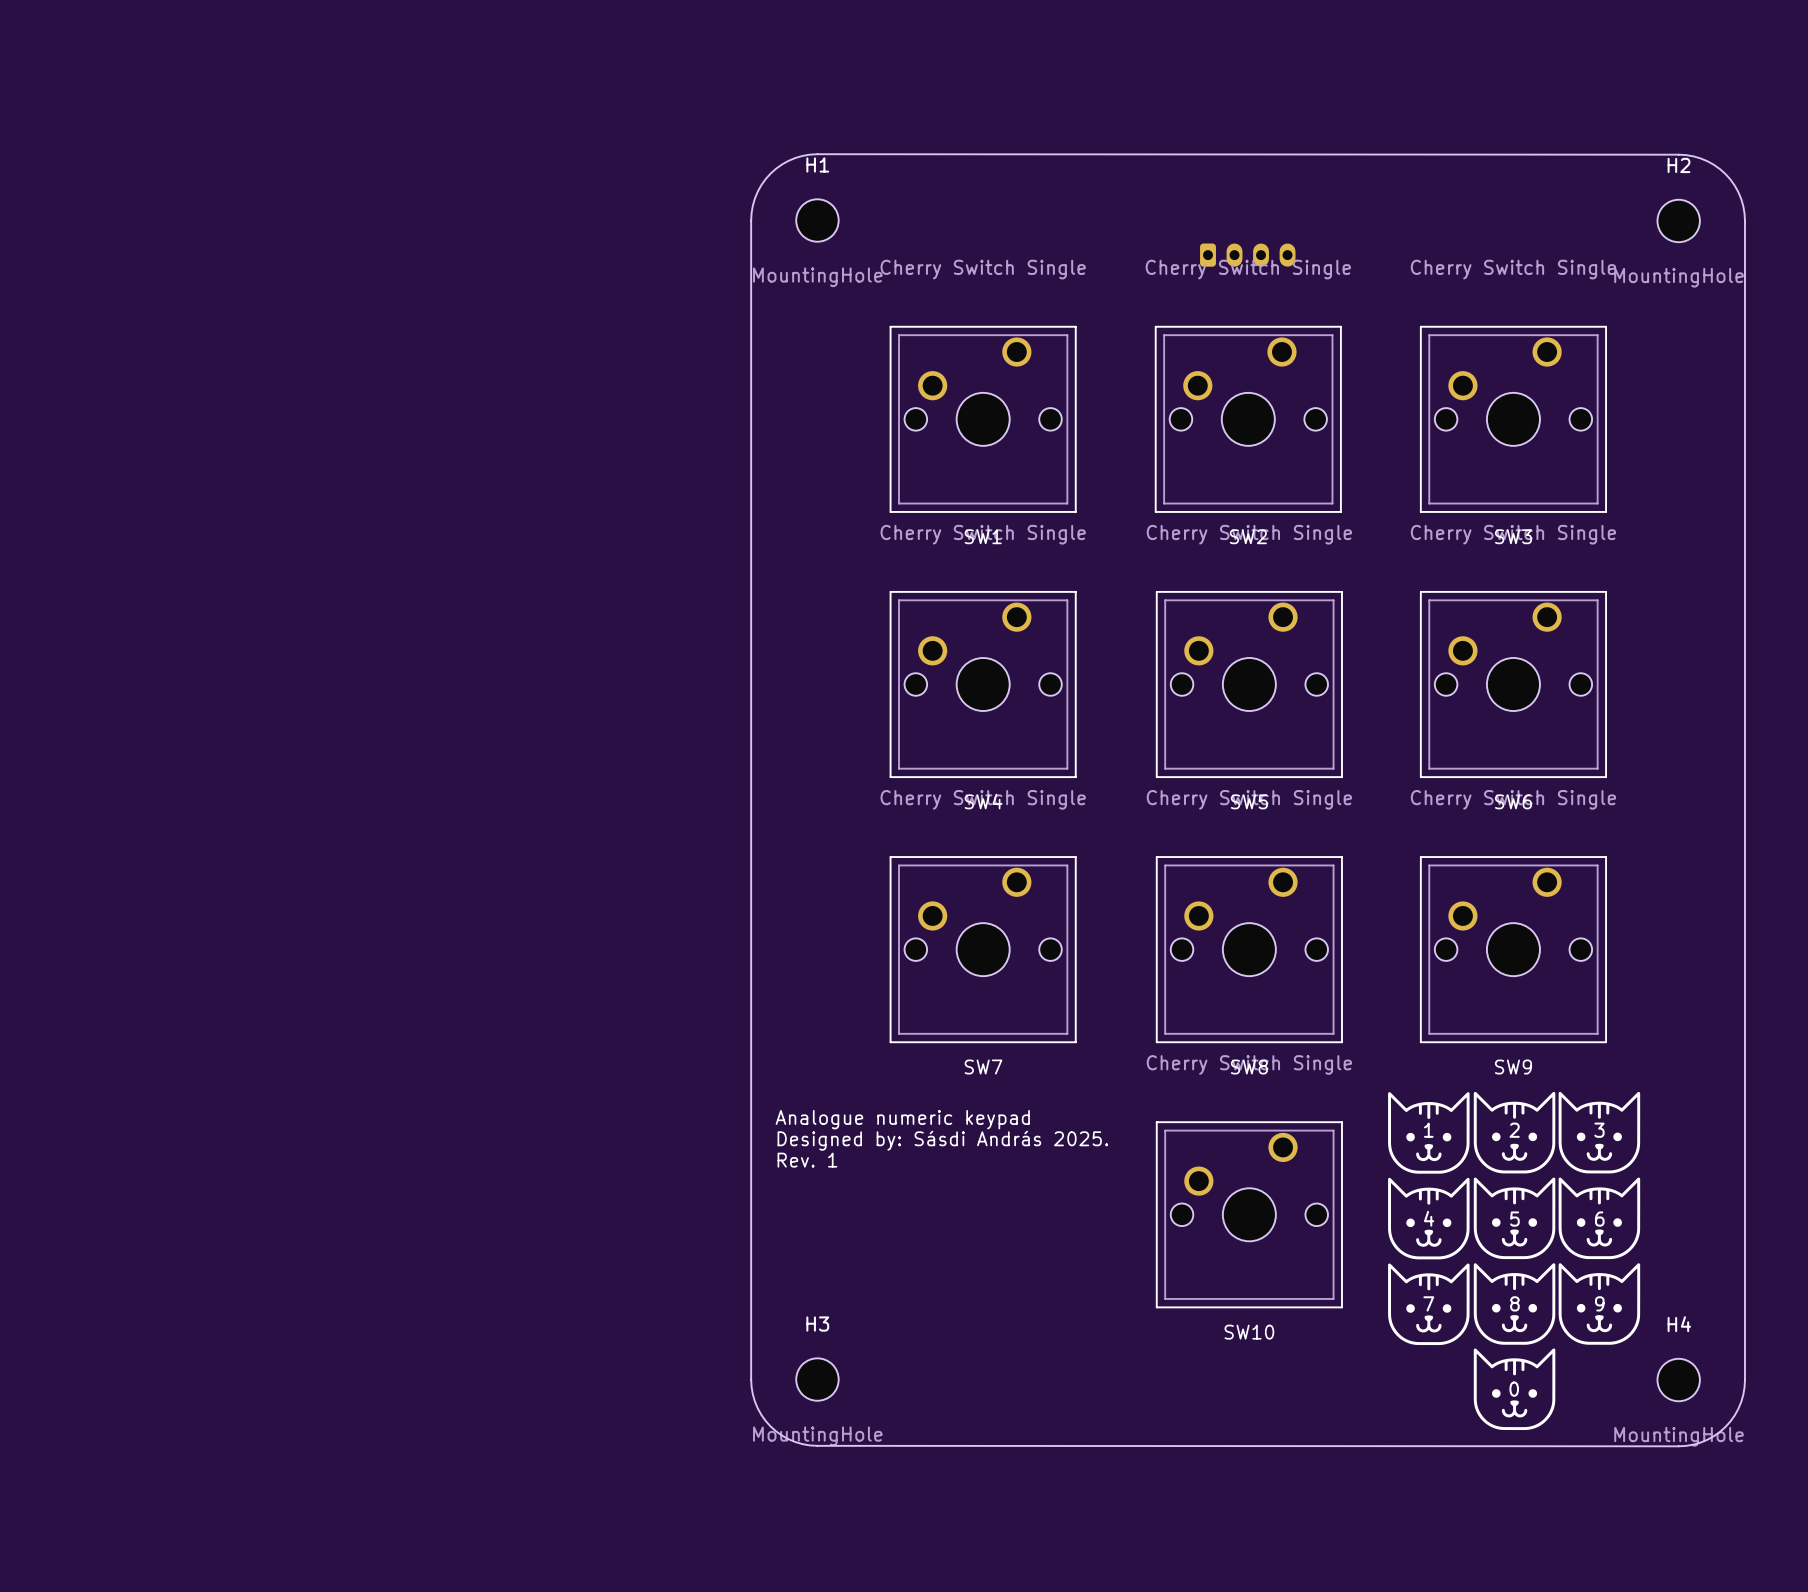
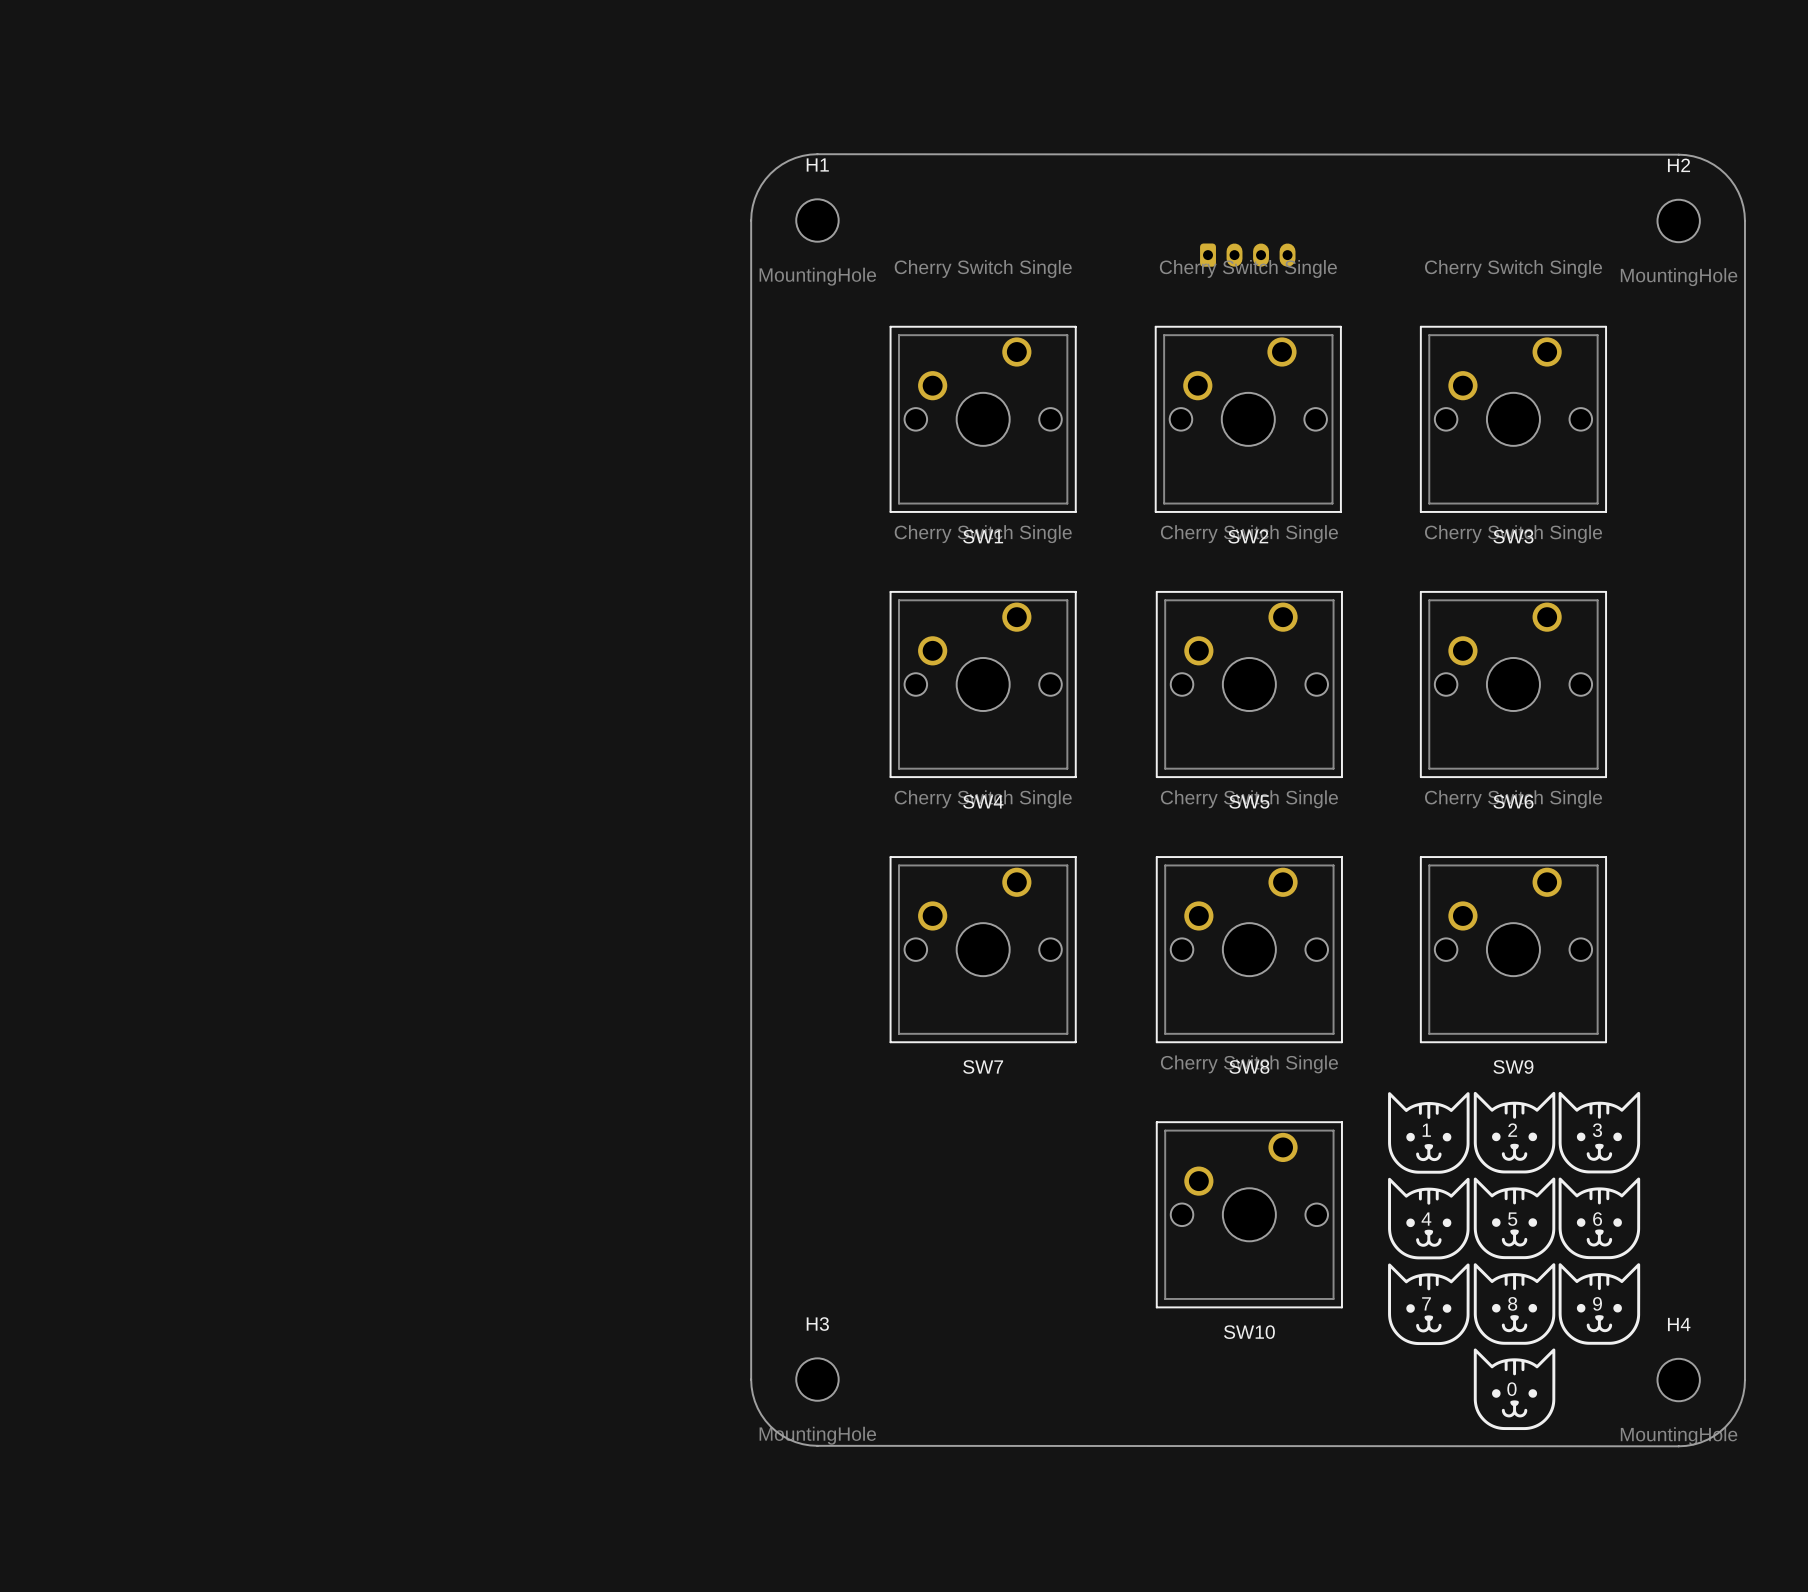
text: Analogue numeric keypad (902, 1119) -> none
text: Designed by: Sásdi András 2025. (942, 1140) -> none
text: Rev. 1 (807, 1160) -> none

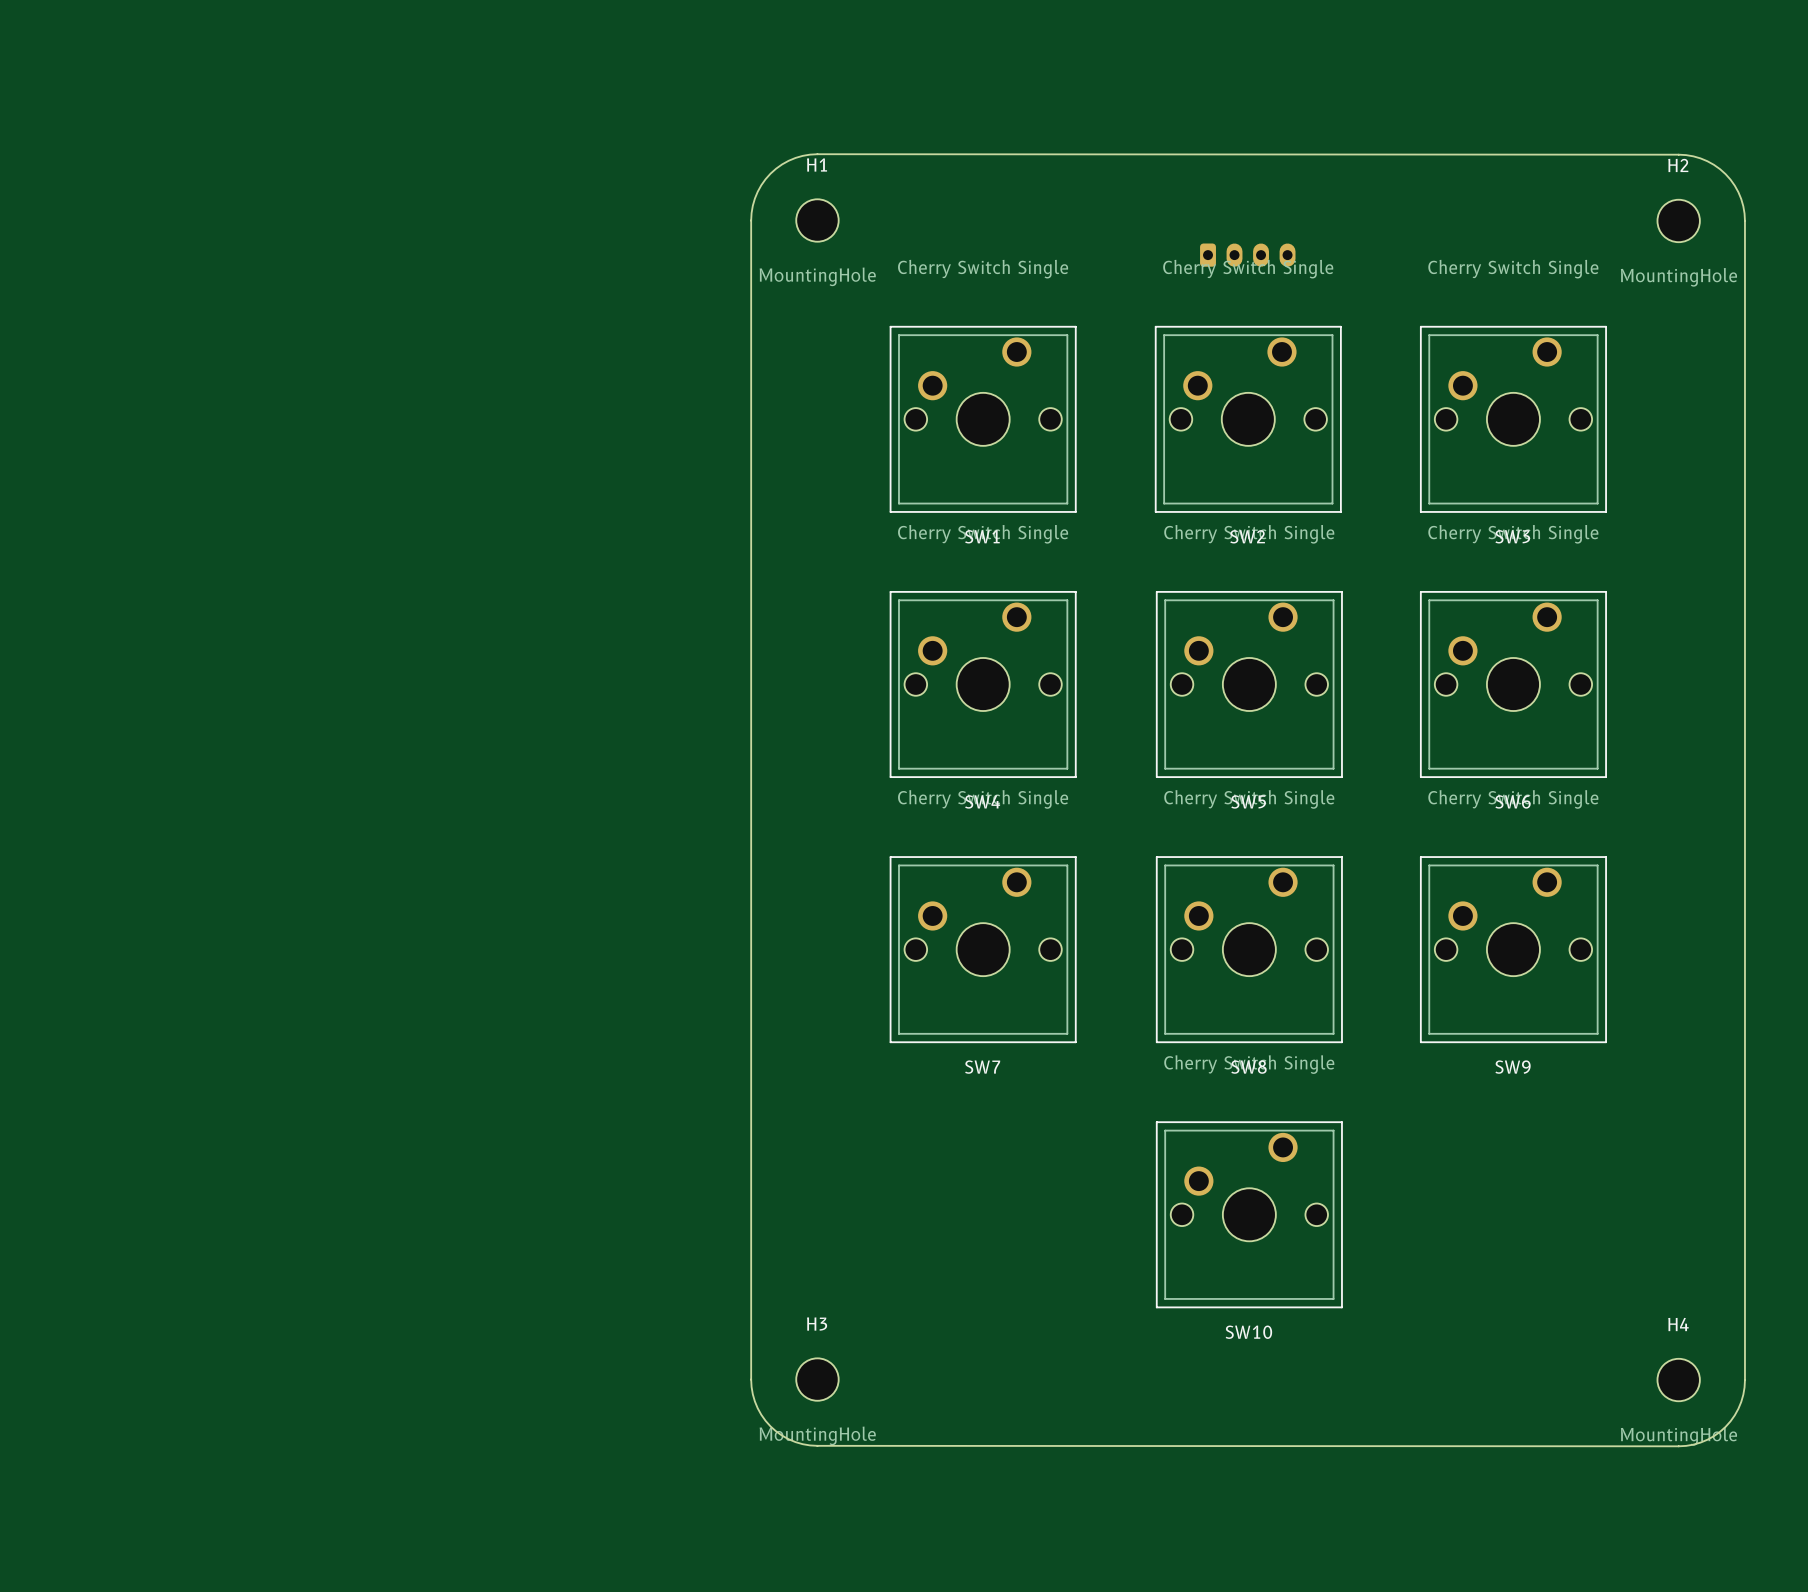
drawing: [1388, 1091, 1641, 1431] -> none
text: 1 (1426, 1130) -> none
text: 2 (1512, 1130) -> none
text: 3 (1597, 1130) -> none
text: 4 (1426, 1219) -> none
text: 5 (1512, 1219) -> none
text: 6 (1597, 1219) -> none
text: 7 (1426, 1303) -> none
text: 8 (1512, 1303) -> none
text: 9 (1597, 1303) -> none
text: 0 (1511, 1389) -> none

